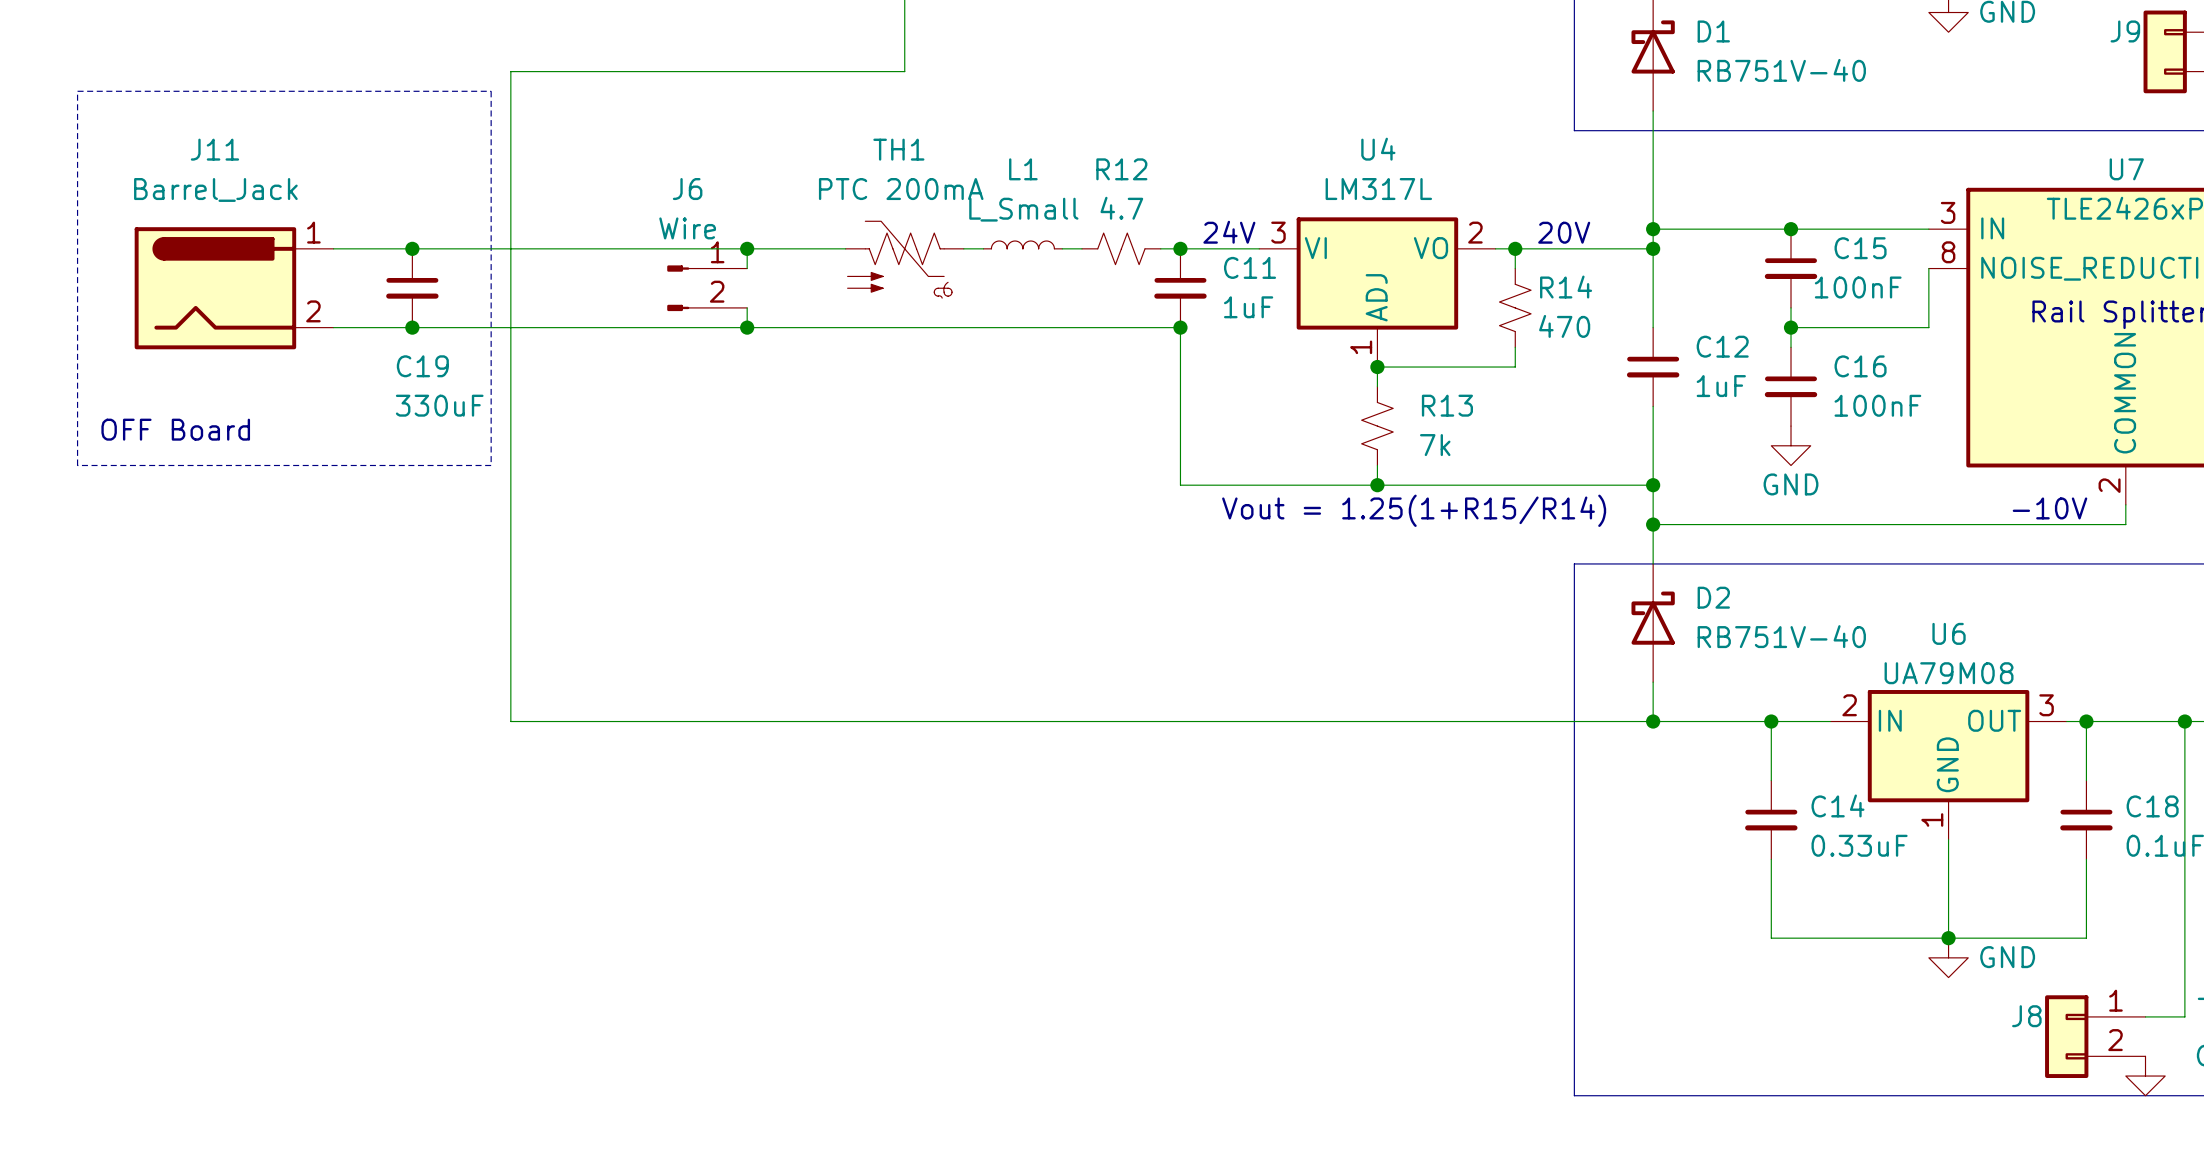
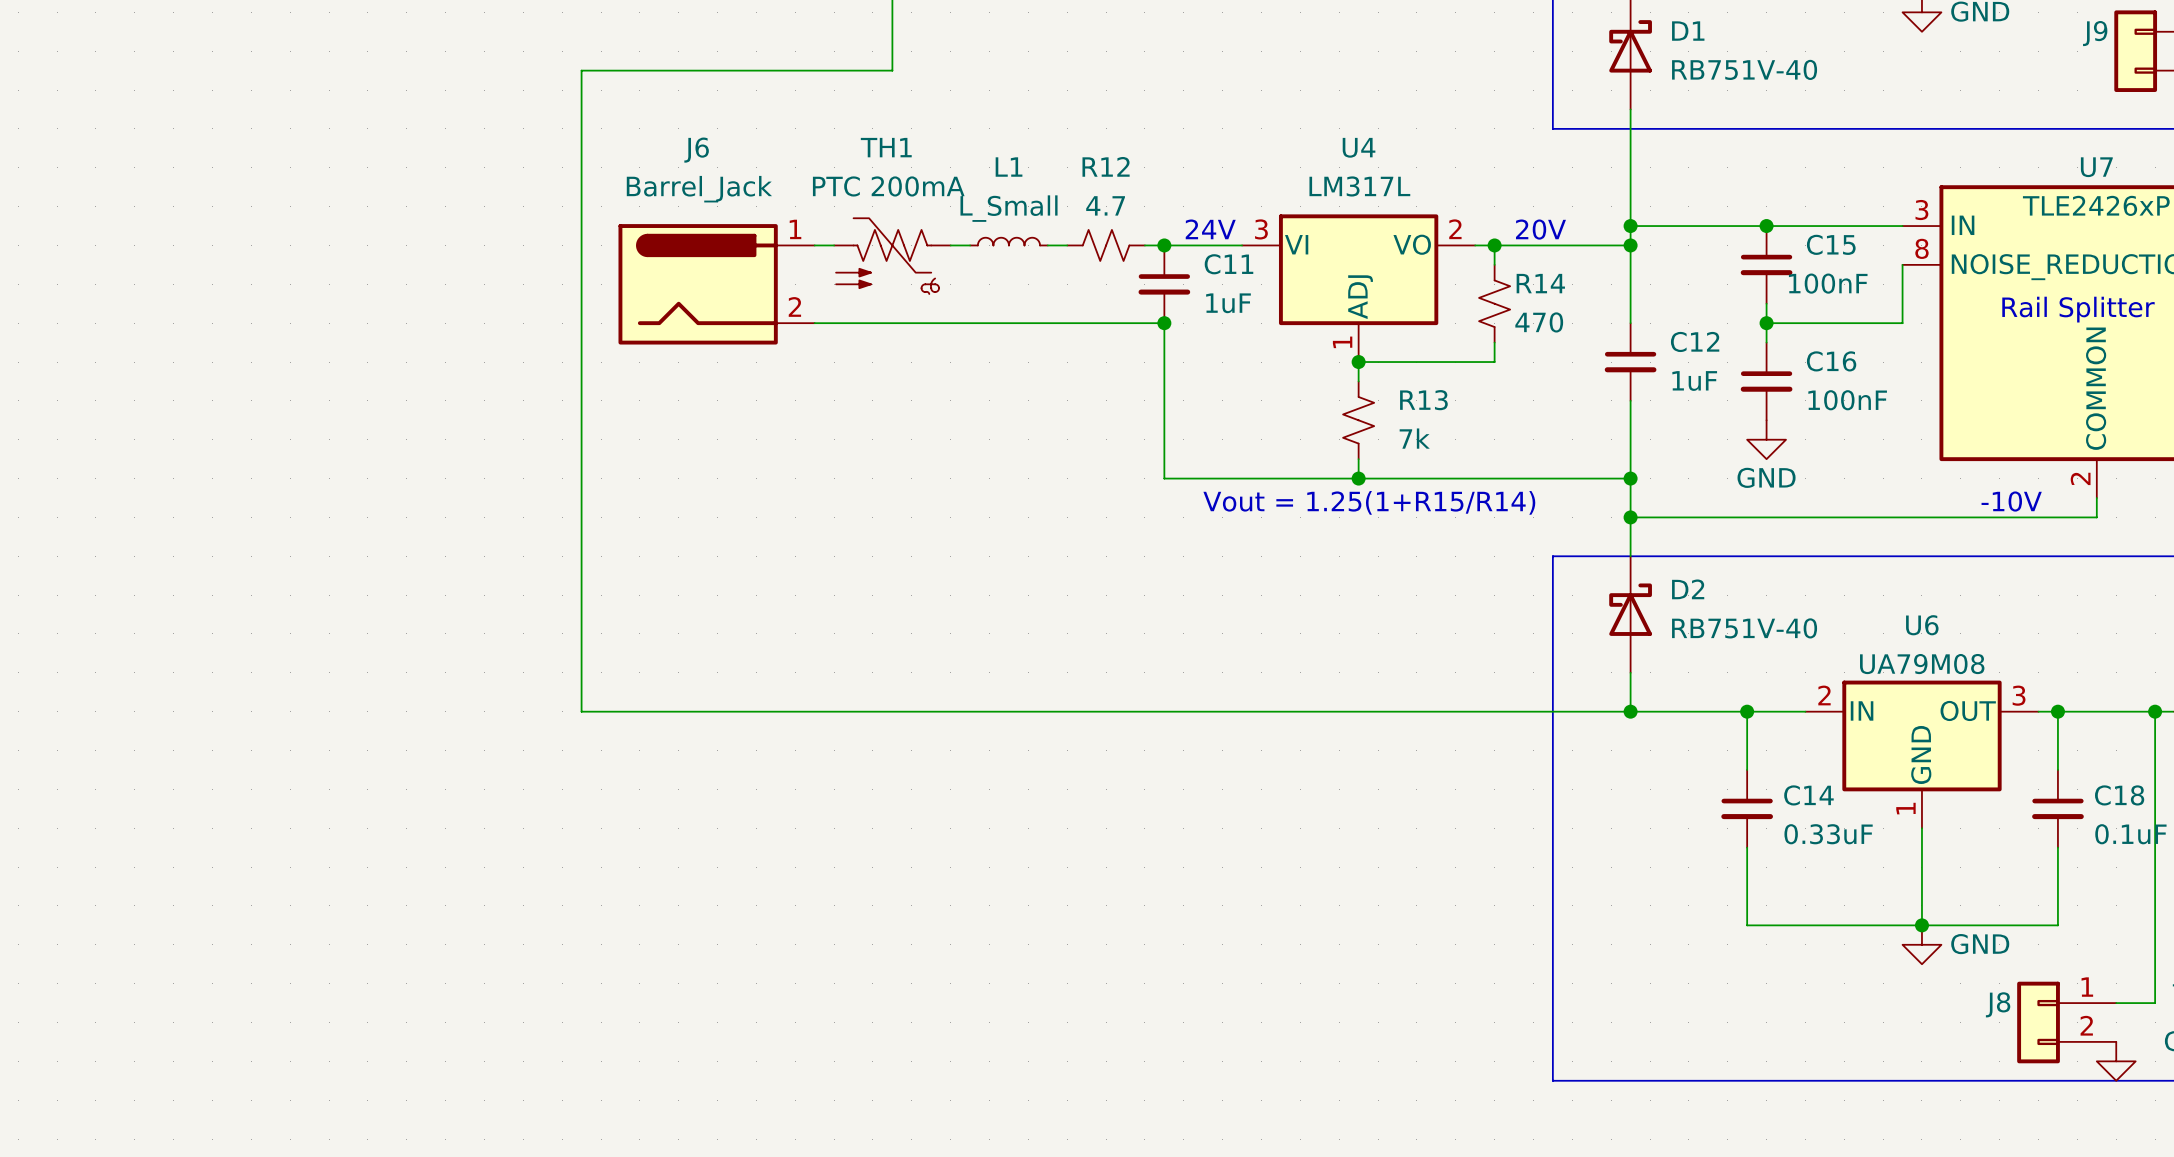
wire: (589, 71) (510, 71) (510, 721) (589, 721) -> (581, 70) (581, 711)
line: (77, 91) (77, 465) (491, 465) (491, 91) (77, 91) -> none
J6 name position: J6 (687, 189) -> J6 (696, 150)
J6 value: Wire (687, 228) -> Barrel_Jack (699, 189)
wire: (333, 248) (825, 248) -> none
junction: (412, 248) -> none
junction: (747, 248) -> none
J6 symbol: [667, 265, 748, 312] -> [618, 224, 815, 345]
J11: Barrel_Jack (234, 288) -> none
C19: 330uF (412, 288) -> none
wire: (333, 327) (825, 327) -> none
junction: (412, 327) -> none
junction: (747, 327) -> none
text: OFF Board (175, 429) -> none

